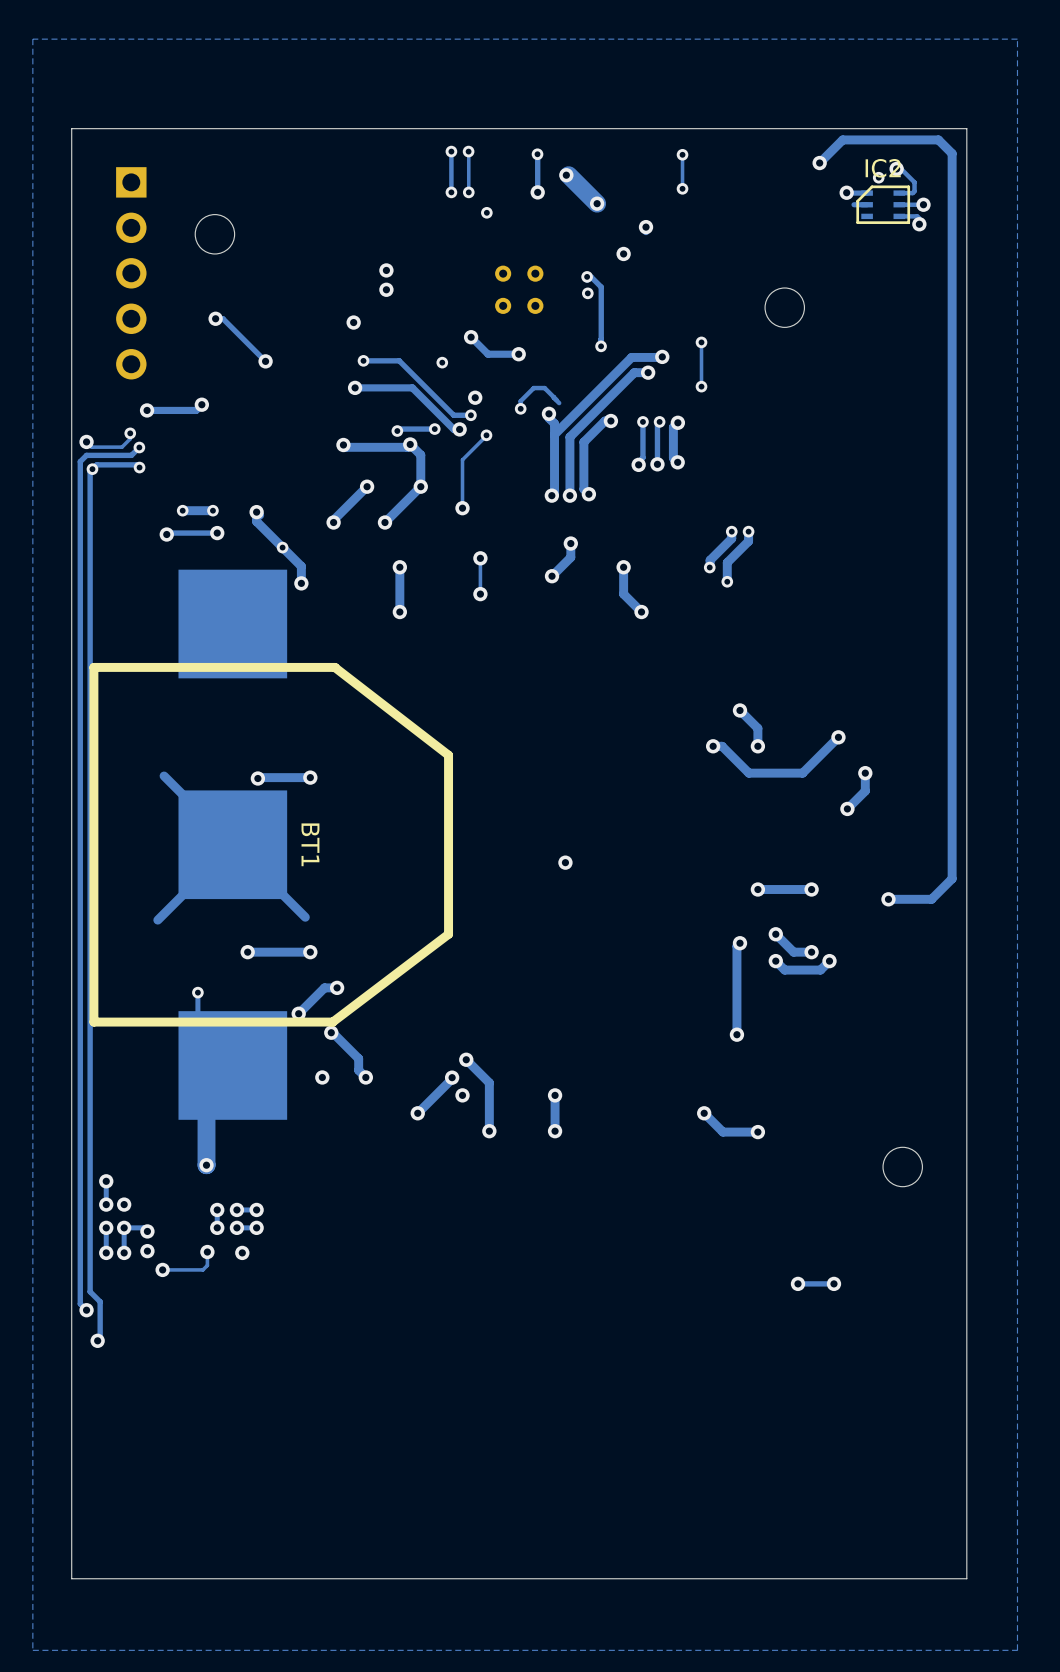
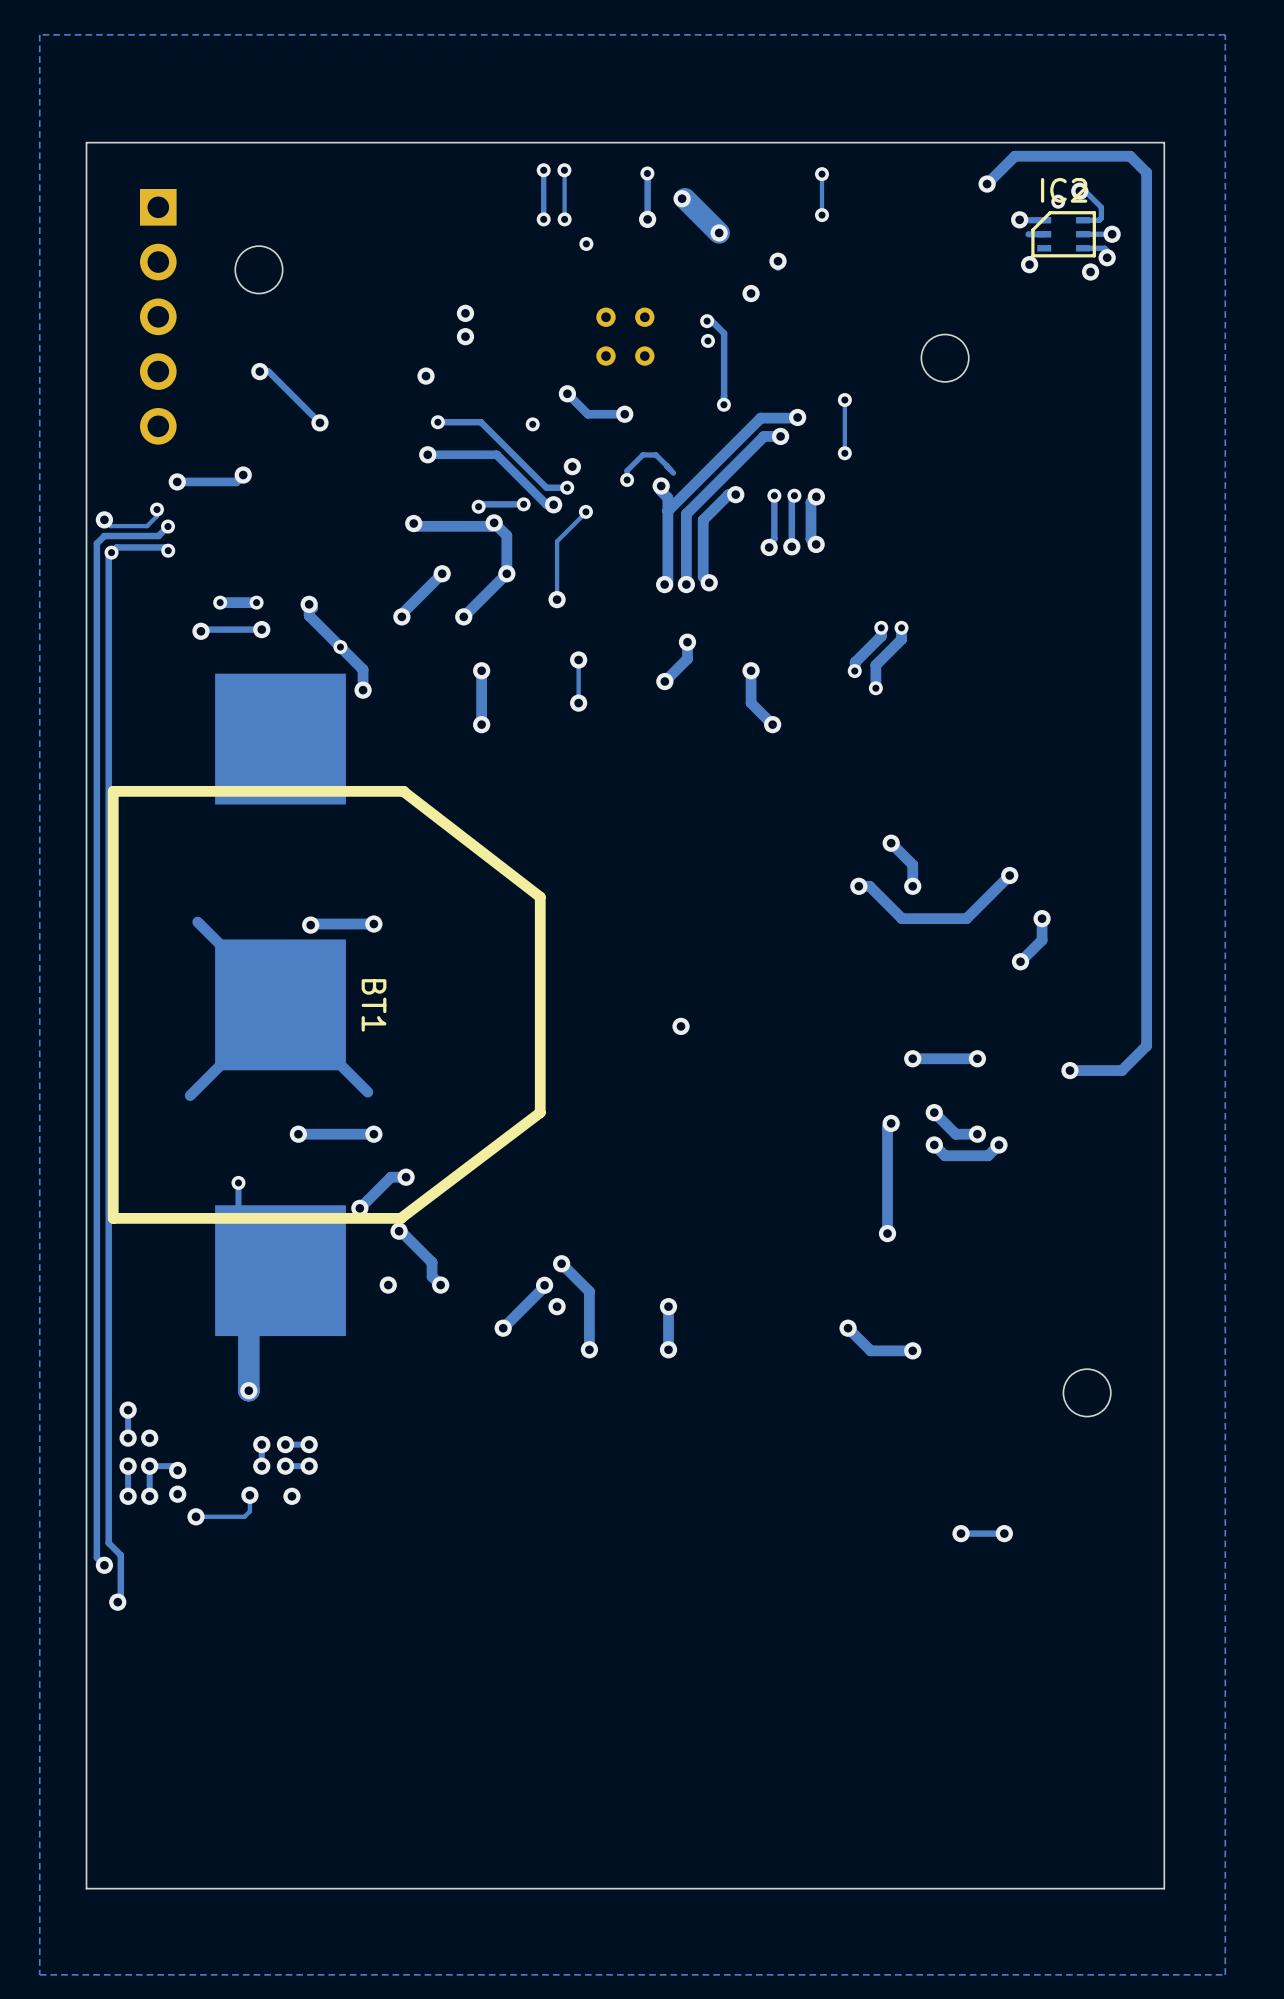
via: none -> (1029, 264)
via: none -> (1090, 271)

